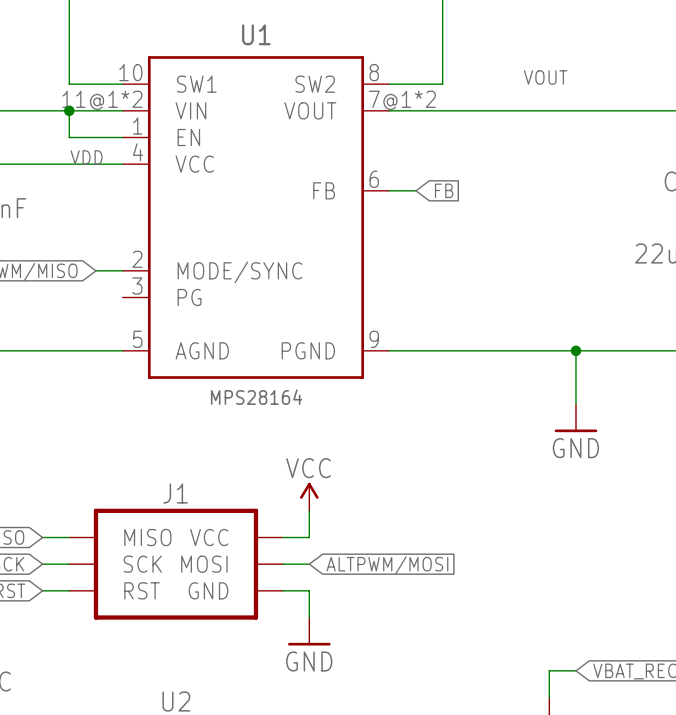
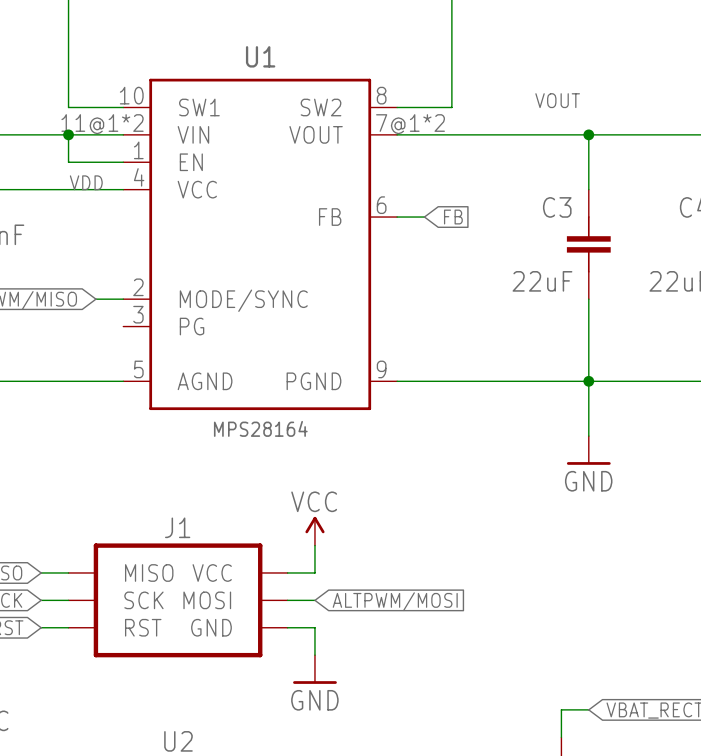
wire: none -> (588, 134) (588, 189)
junction: none -> (588, 134)
C3: none -> 22uF (588, 244)
wire: none -> (588, 299) (588, 381)

